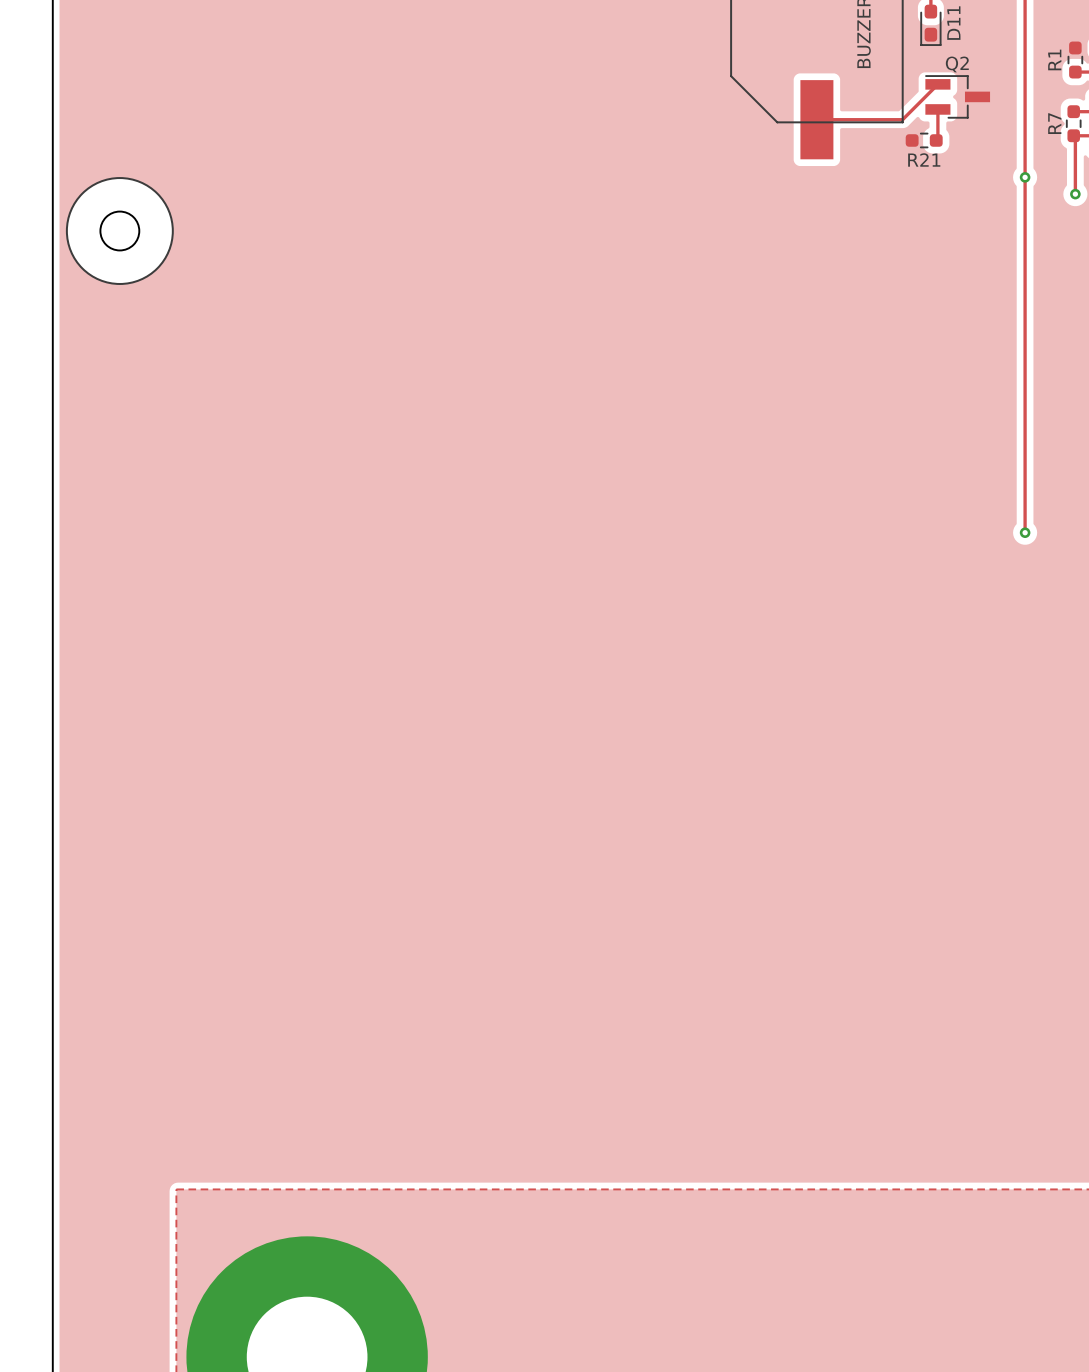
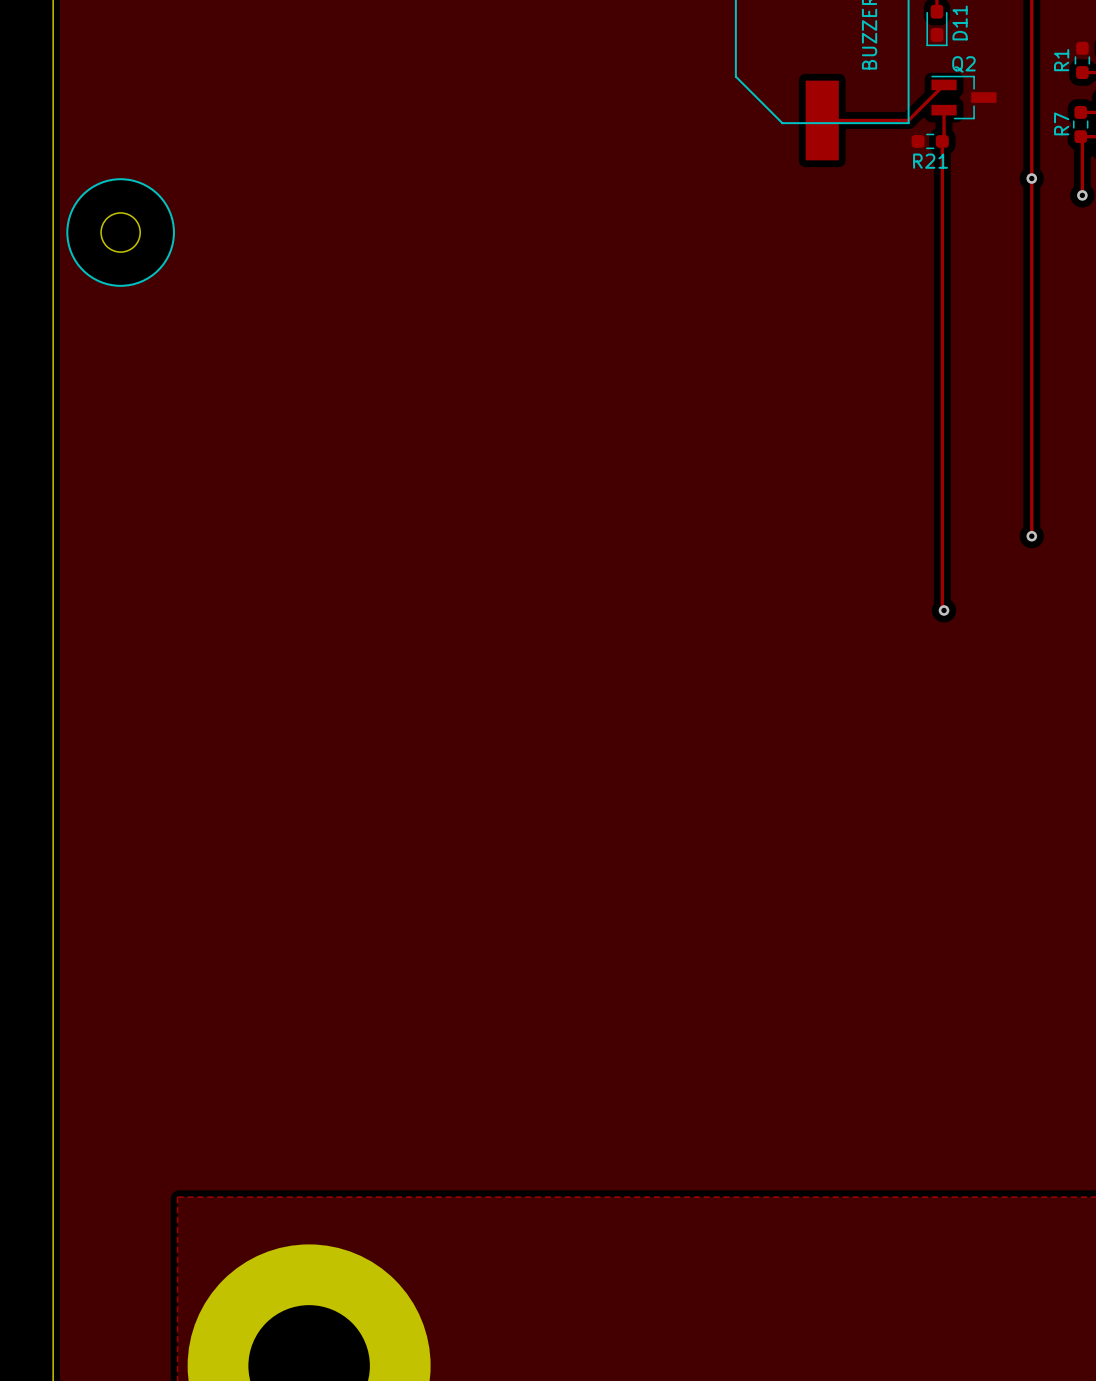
track: none -> (942, 141) (942, 608) (944, 610)
via: none -> (944, 610)

